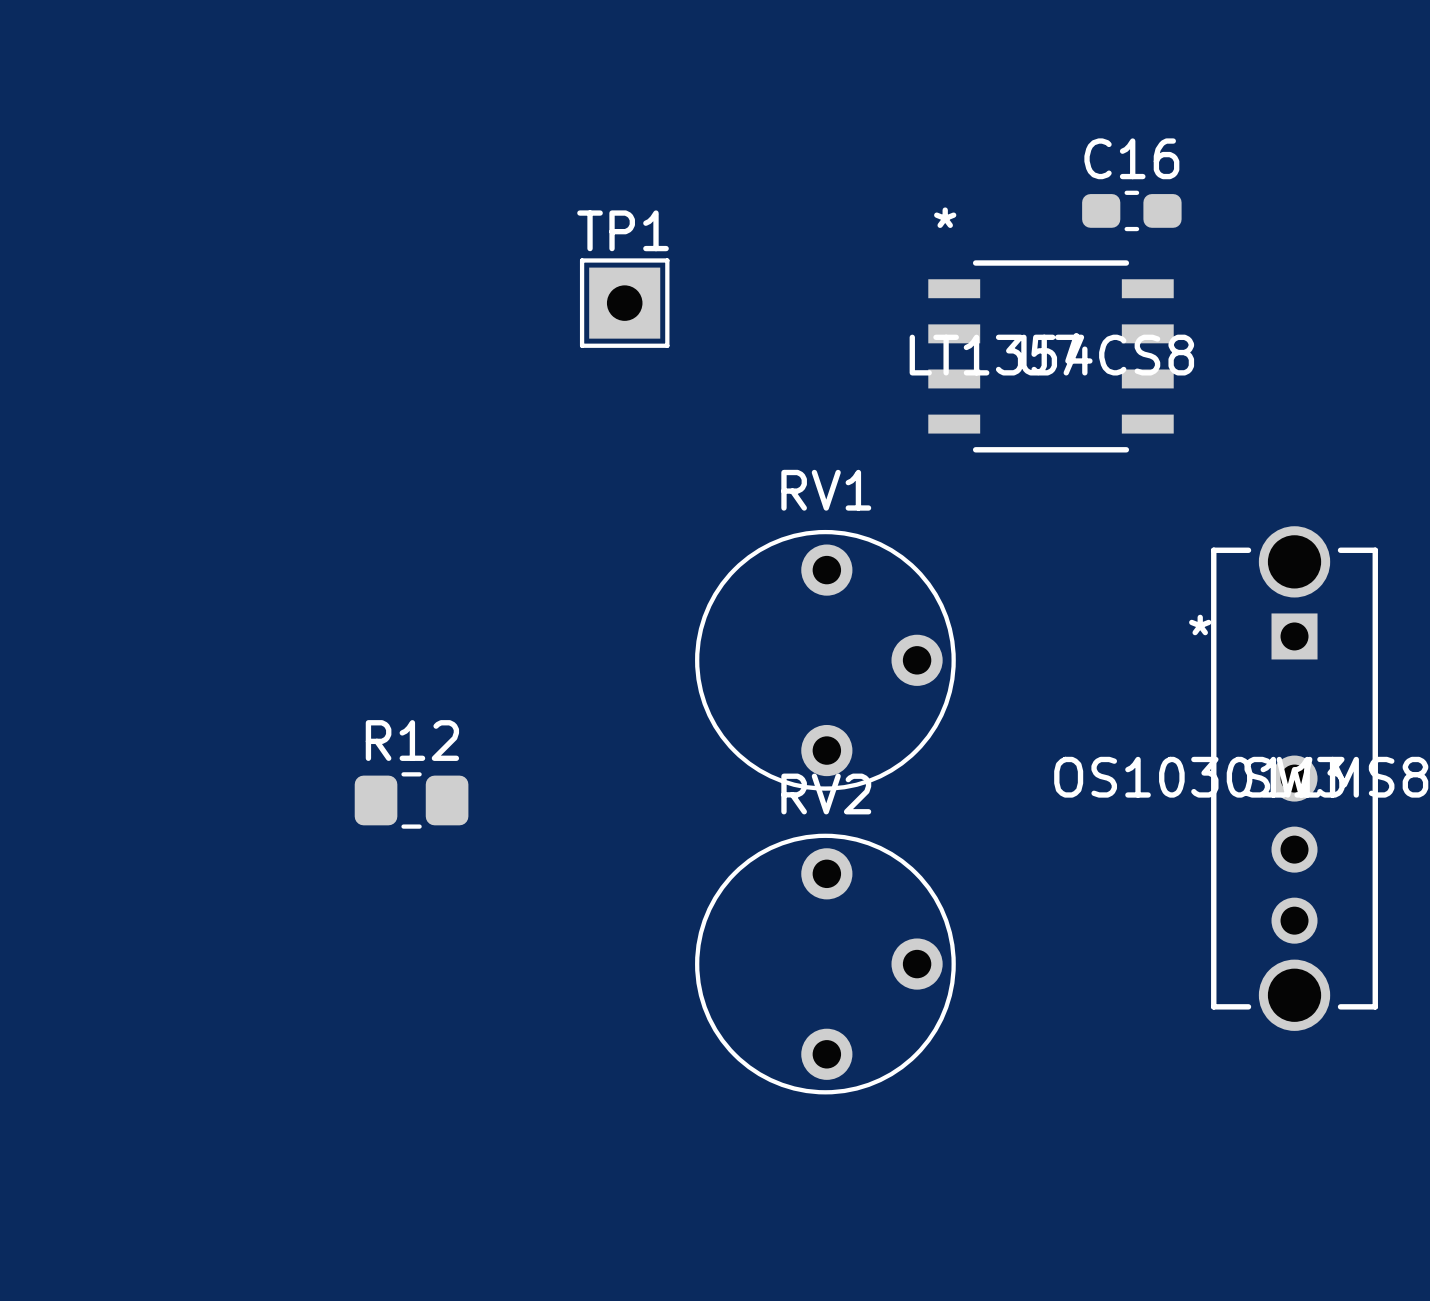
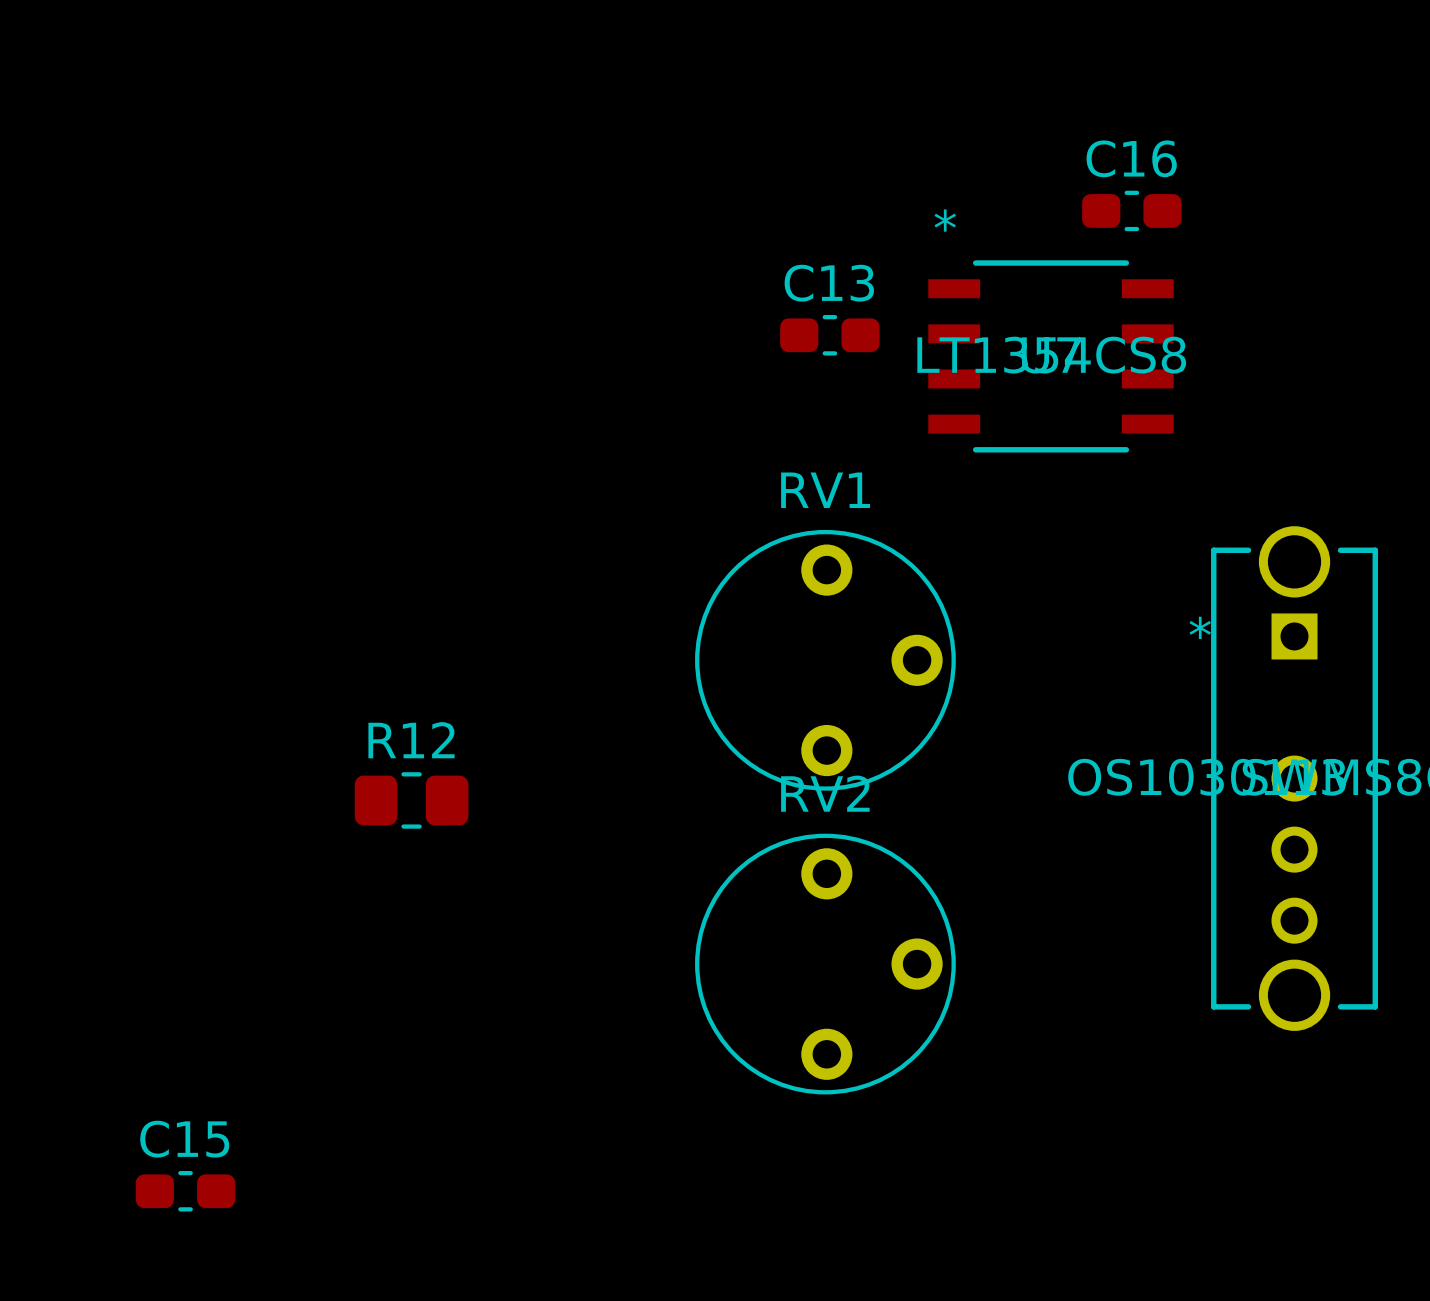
TP1: (624, 303) -> none
C13: none -> (829, 335)
C15: none -> (185, 1191)

